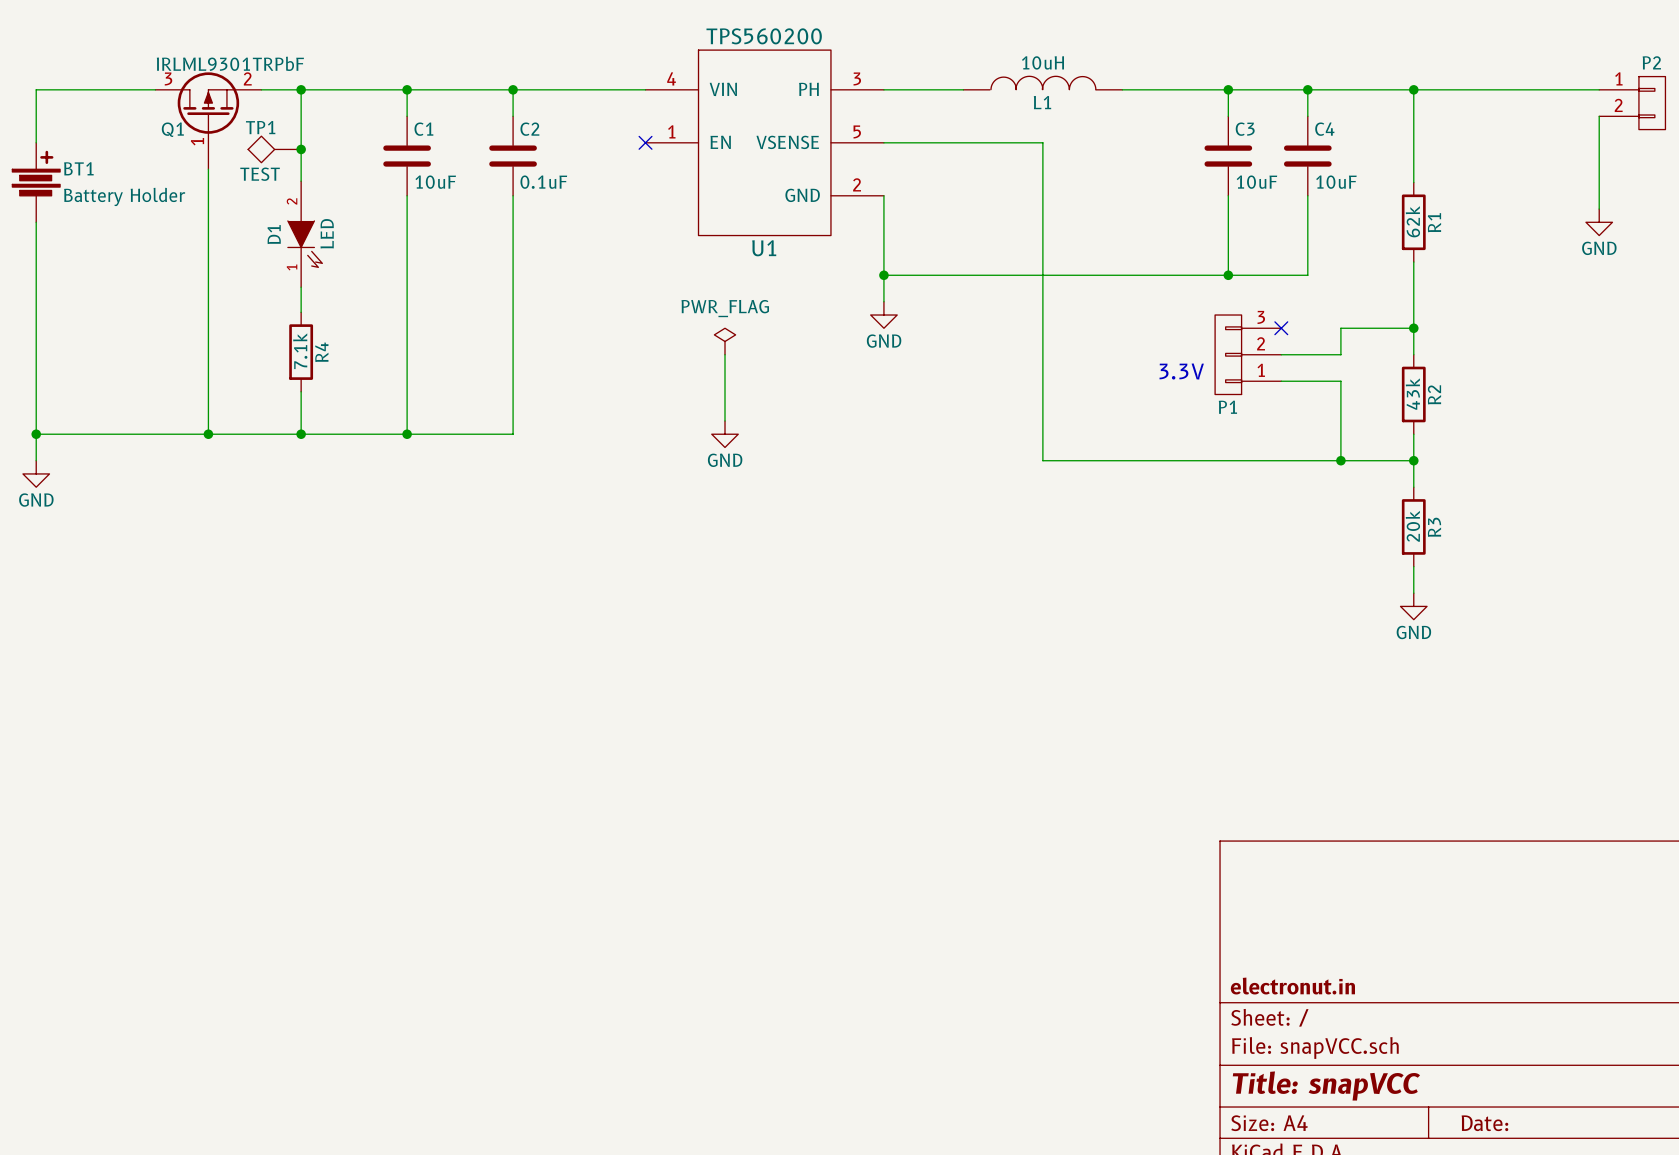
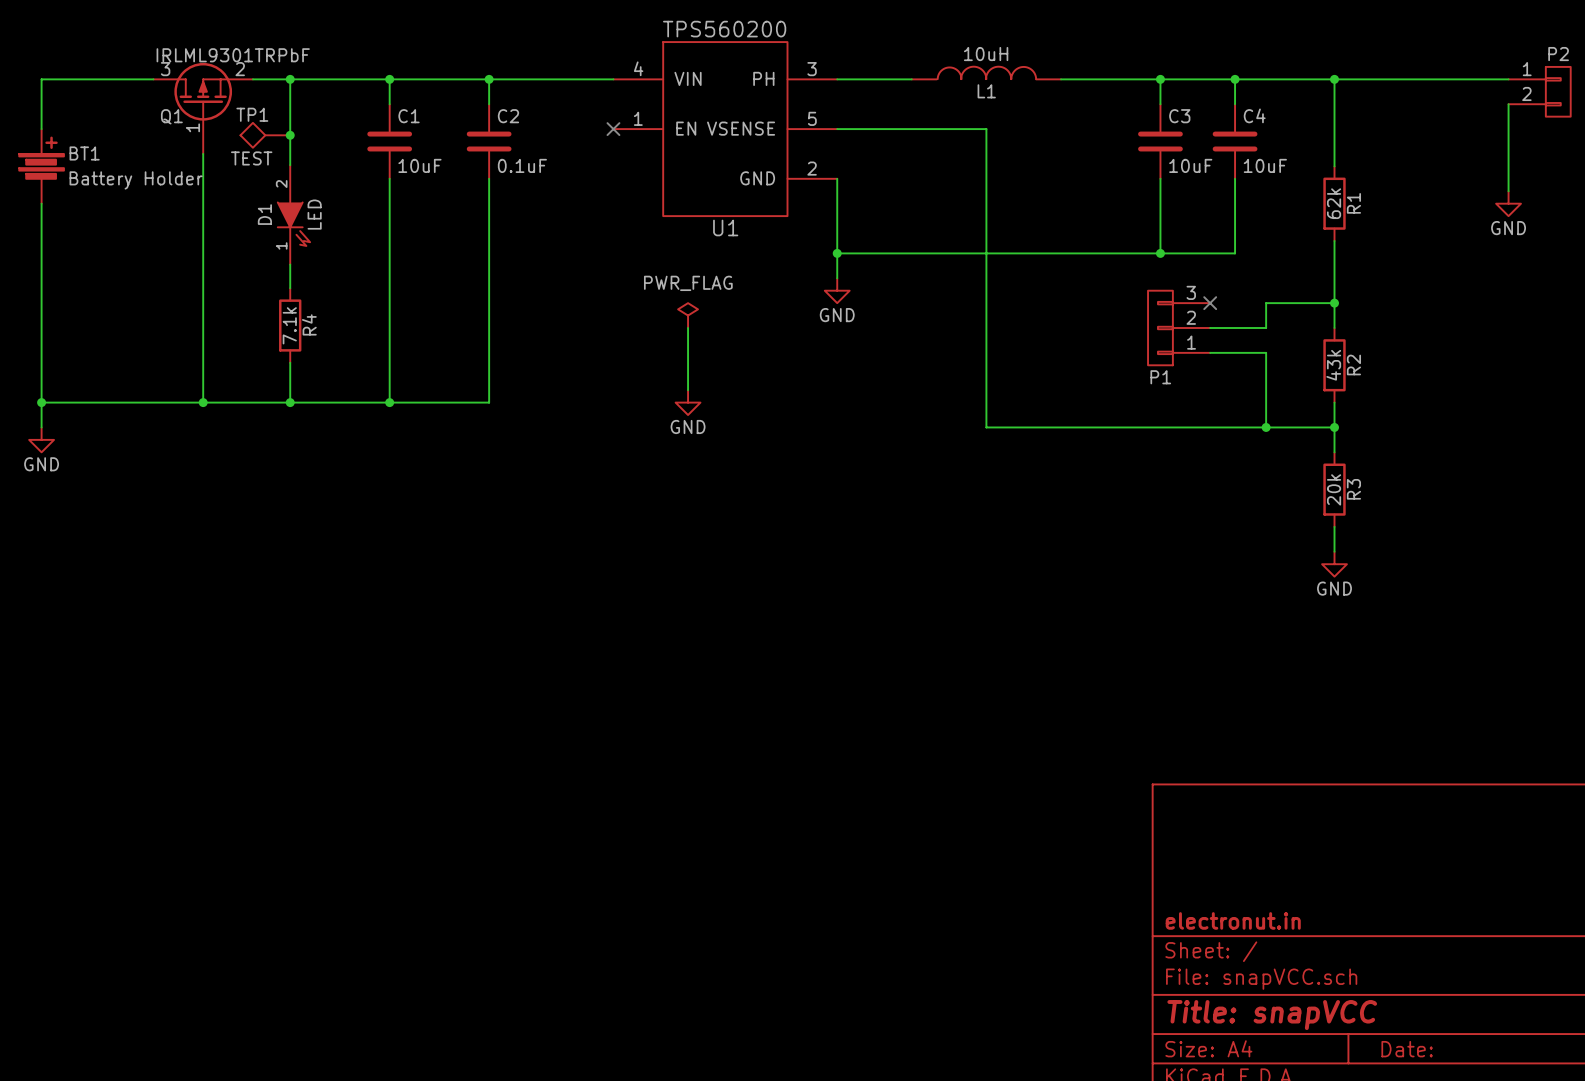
text: 3.3V (1181, 371) -> none

